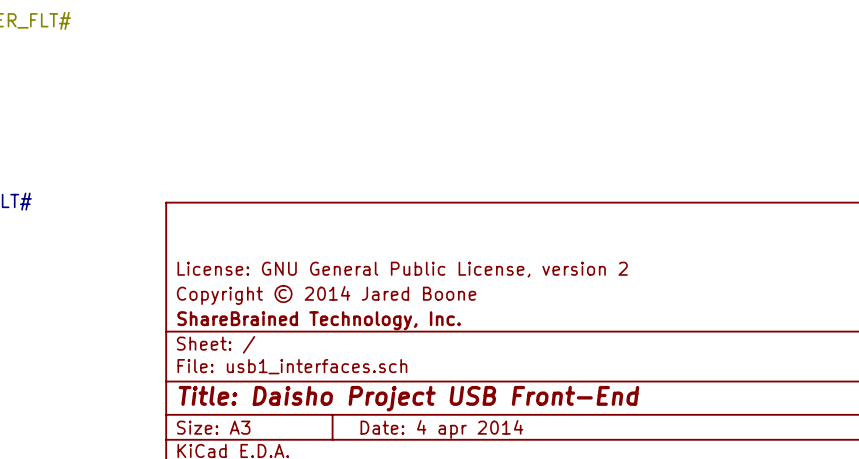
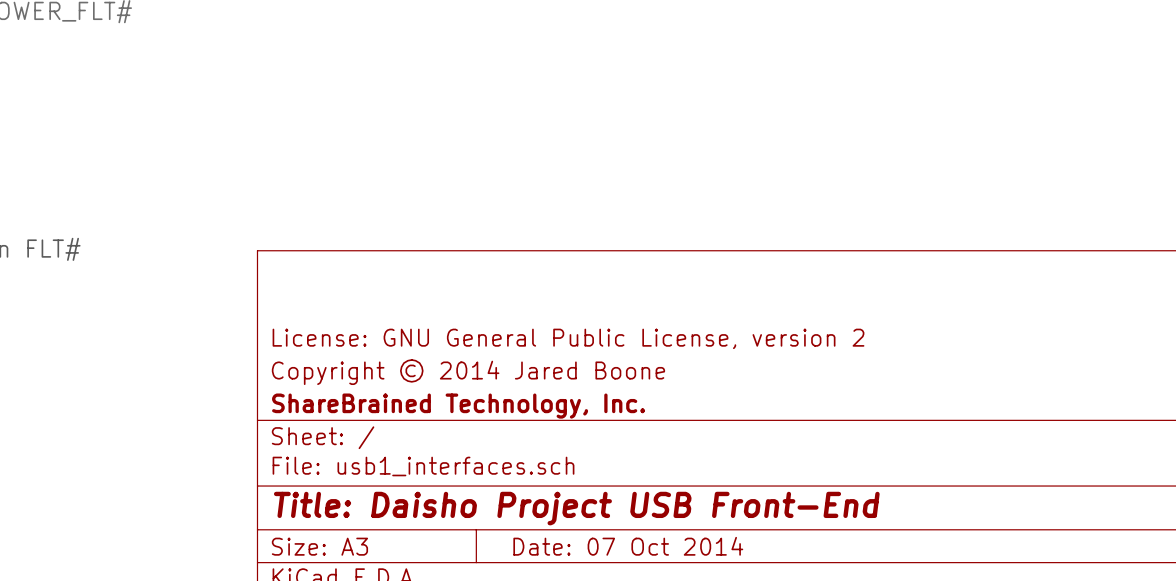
title block: Date: 4 apr 2014 (441, 429) -> Date: 07 Oct 2014 (628, 546)

